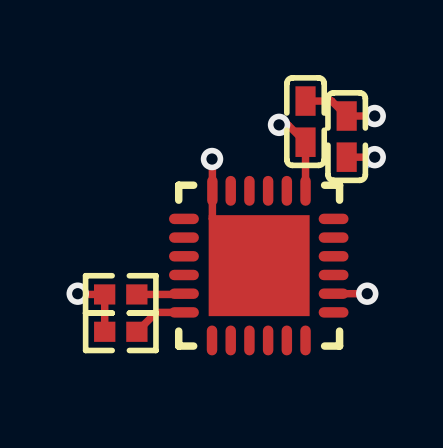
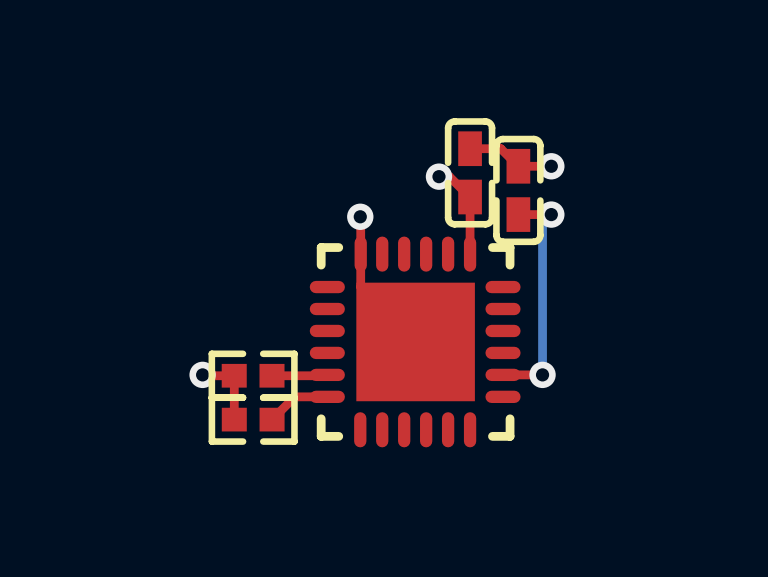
bottom track: none -> (542, 223) (542, 374)

